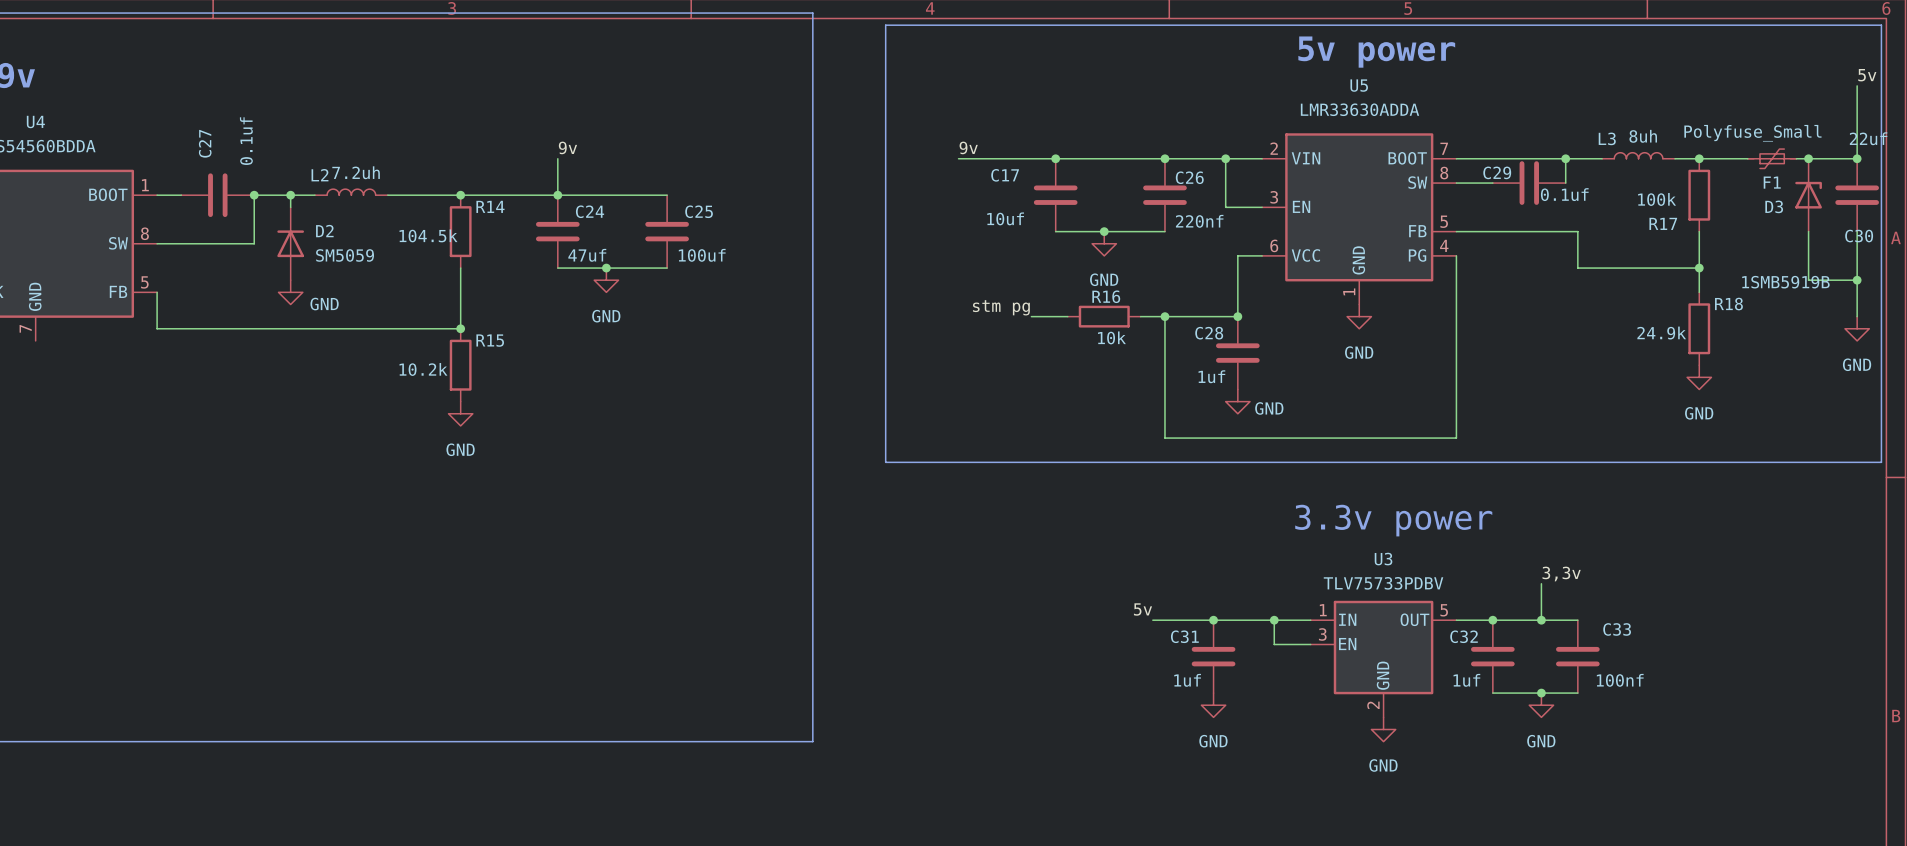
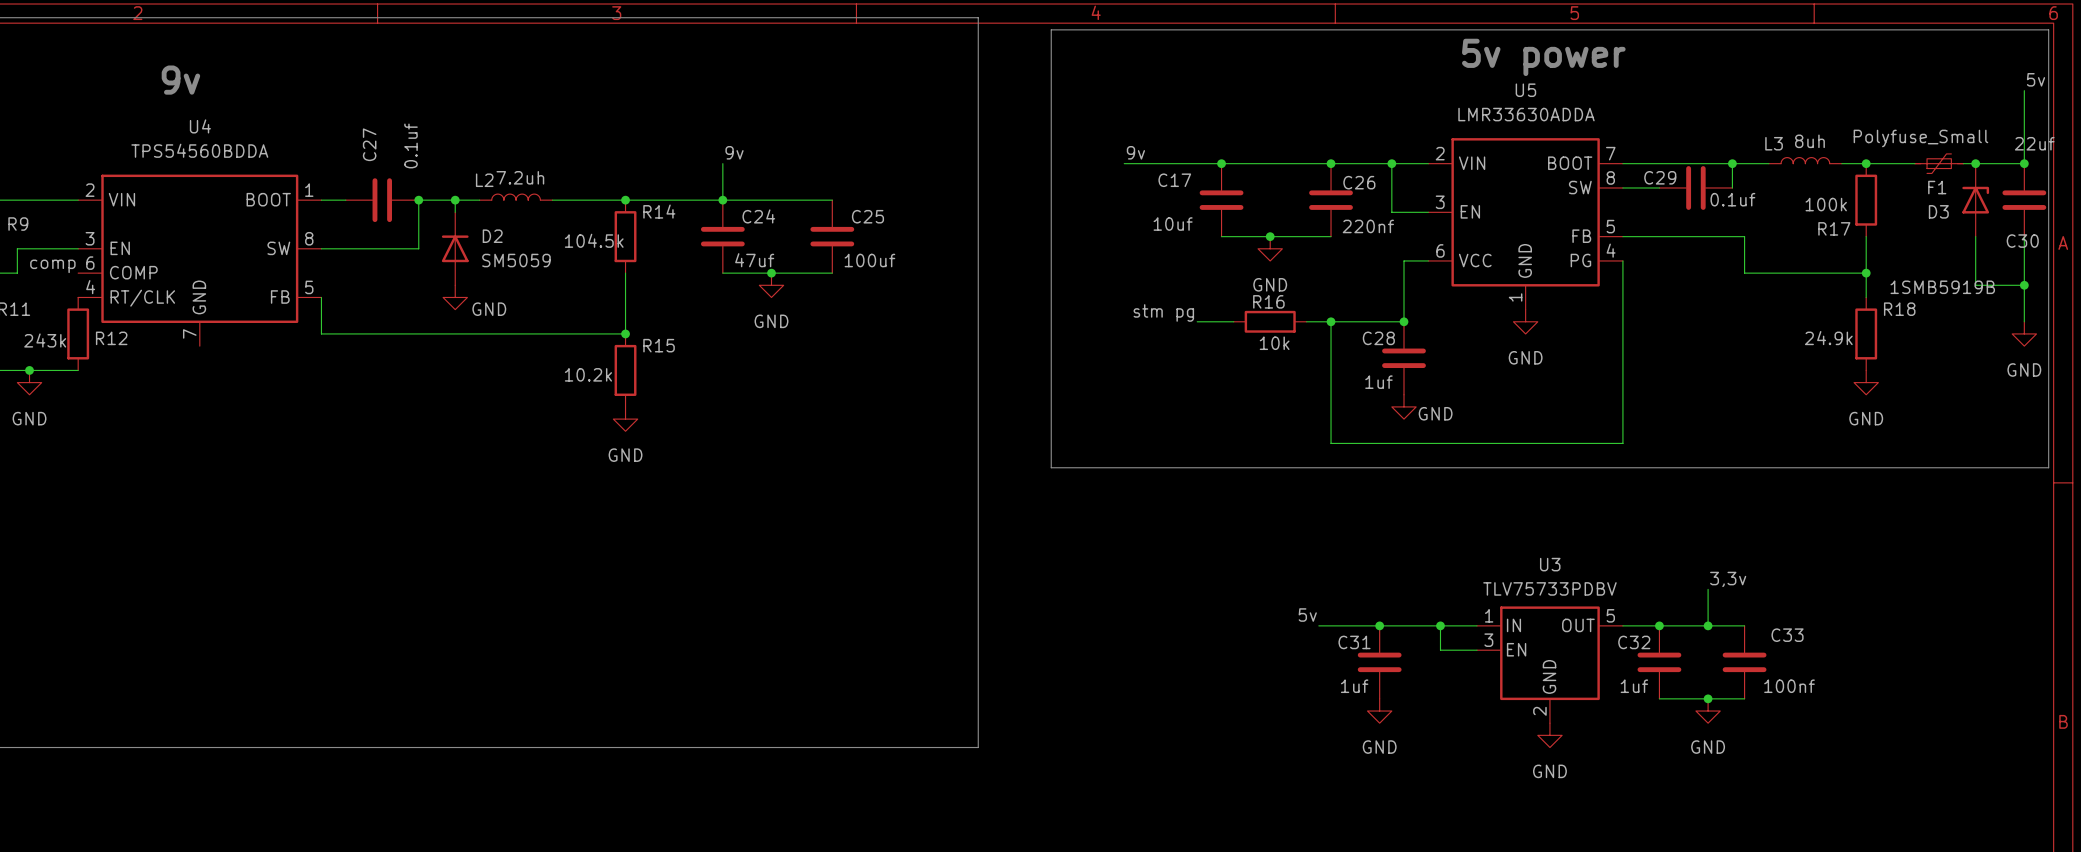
text: 3.3v power (1393, 520) -> none

